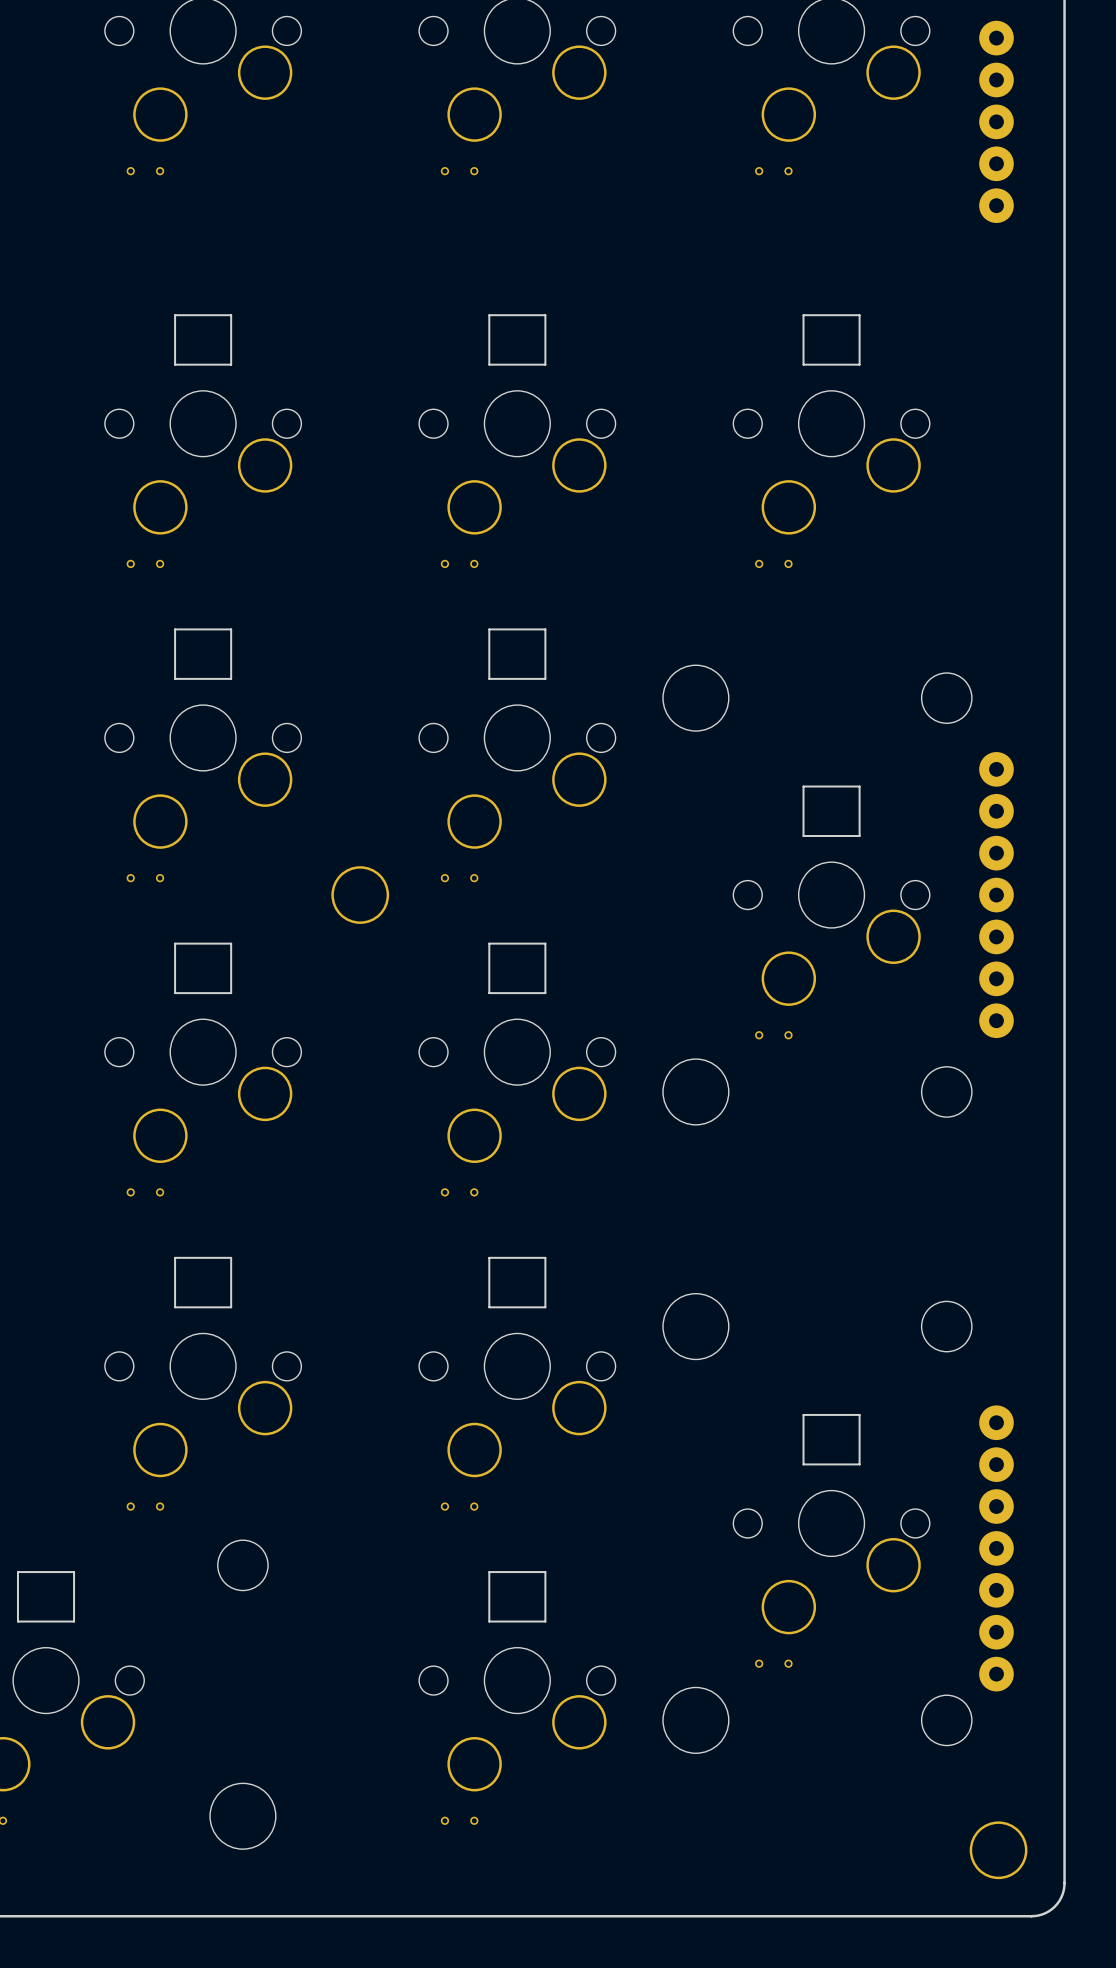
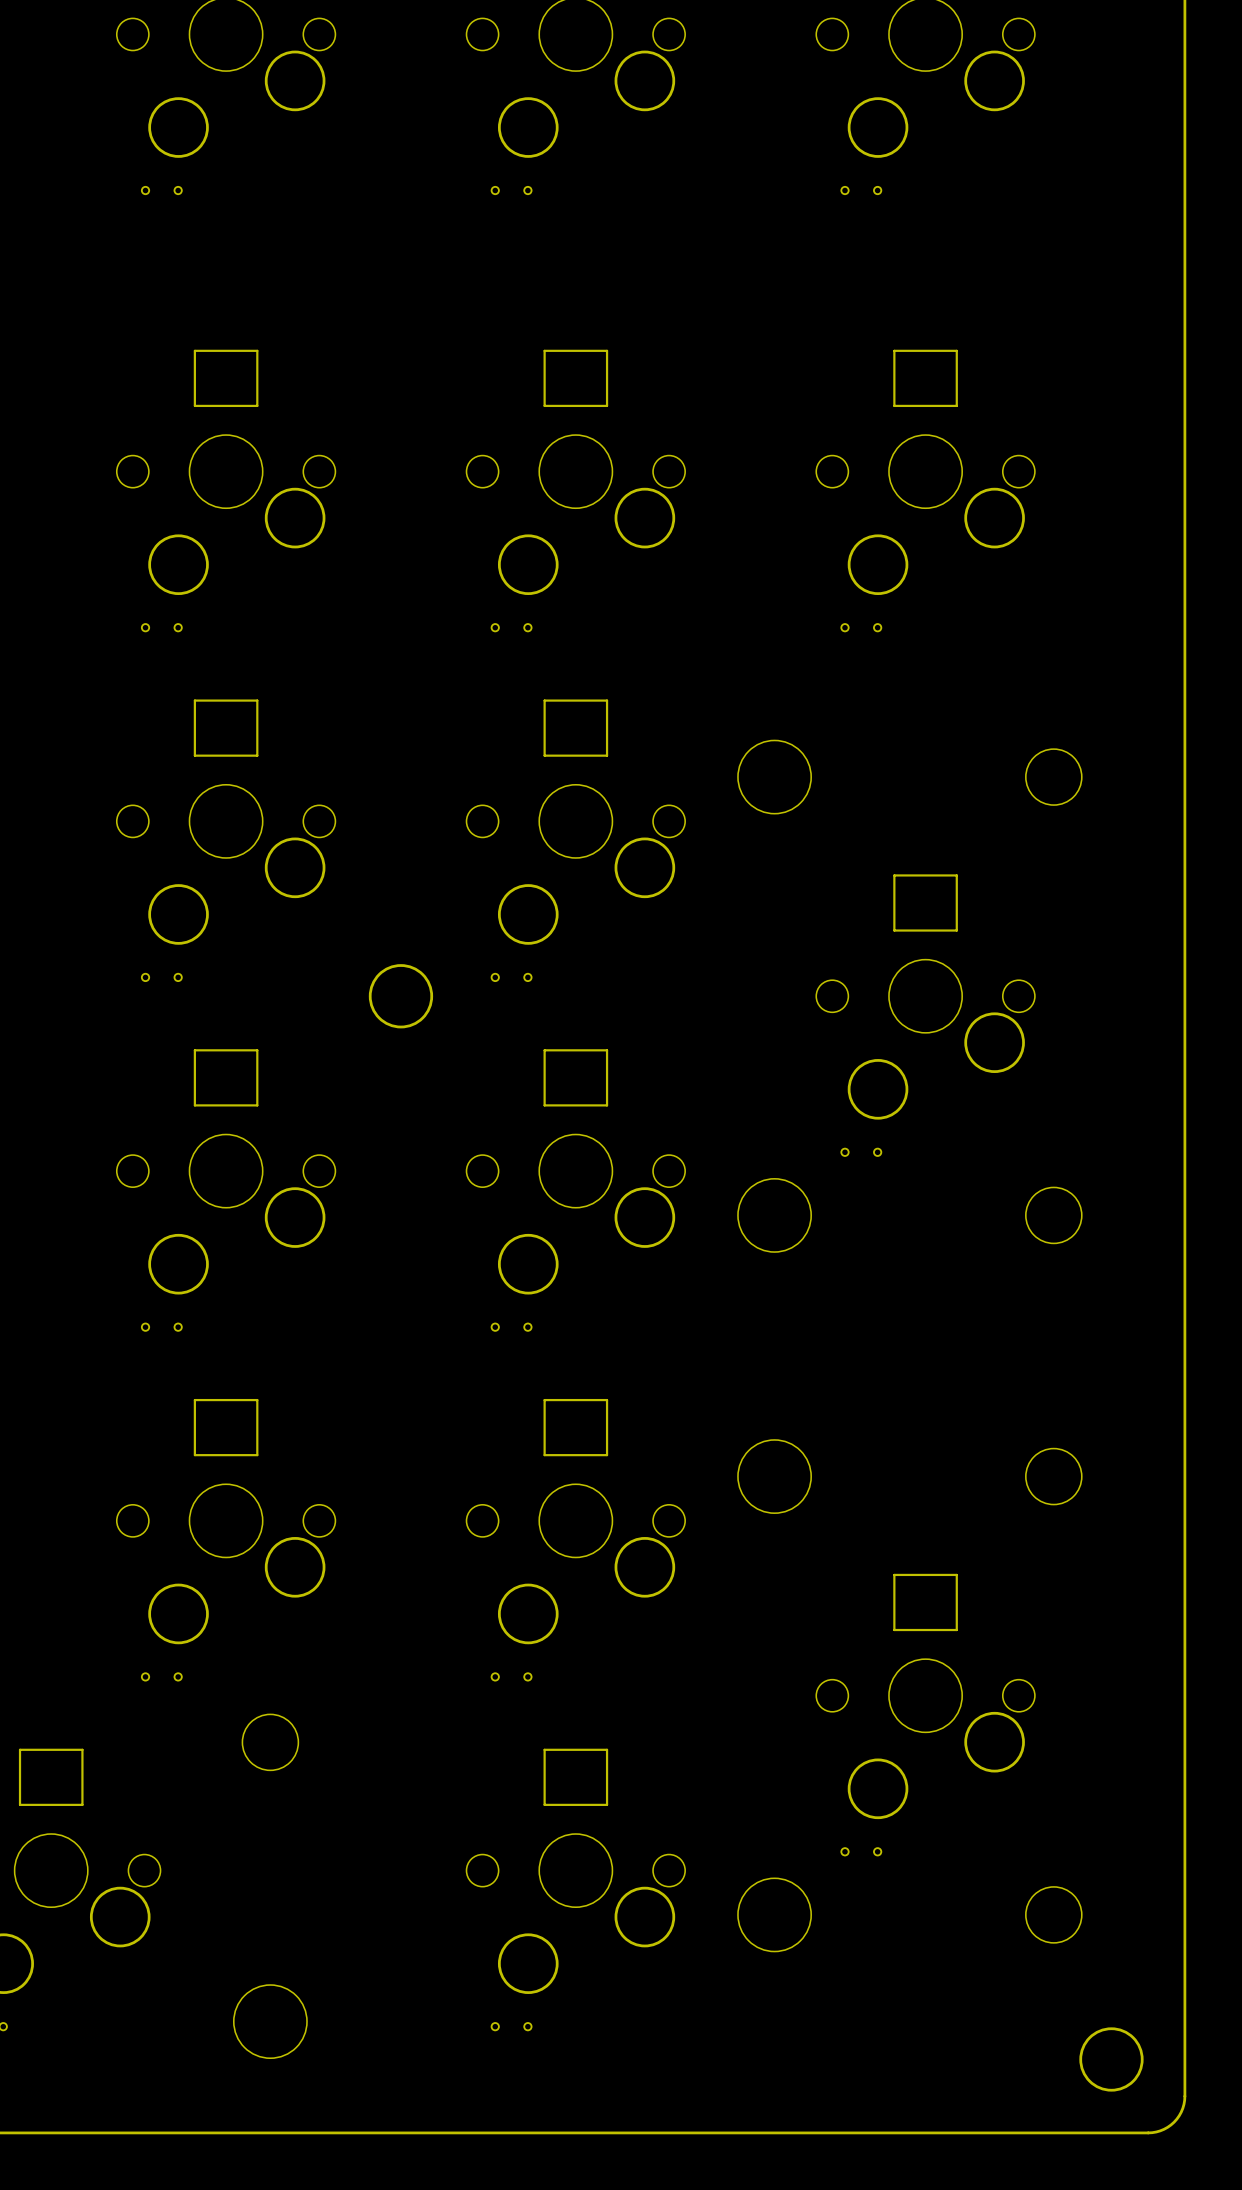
part: (996, 121) -> none
part: (996, 895) -> none
part: (996, 1548) -> none

